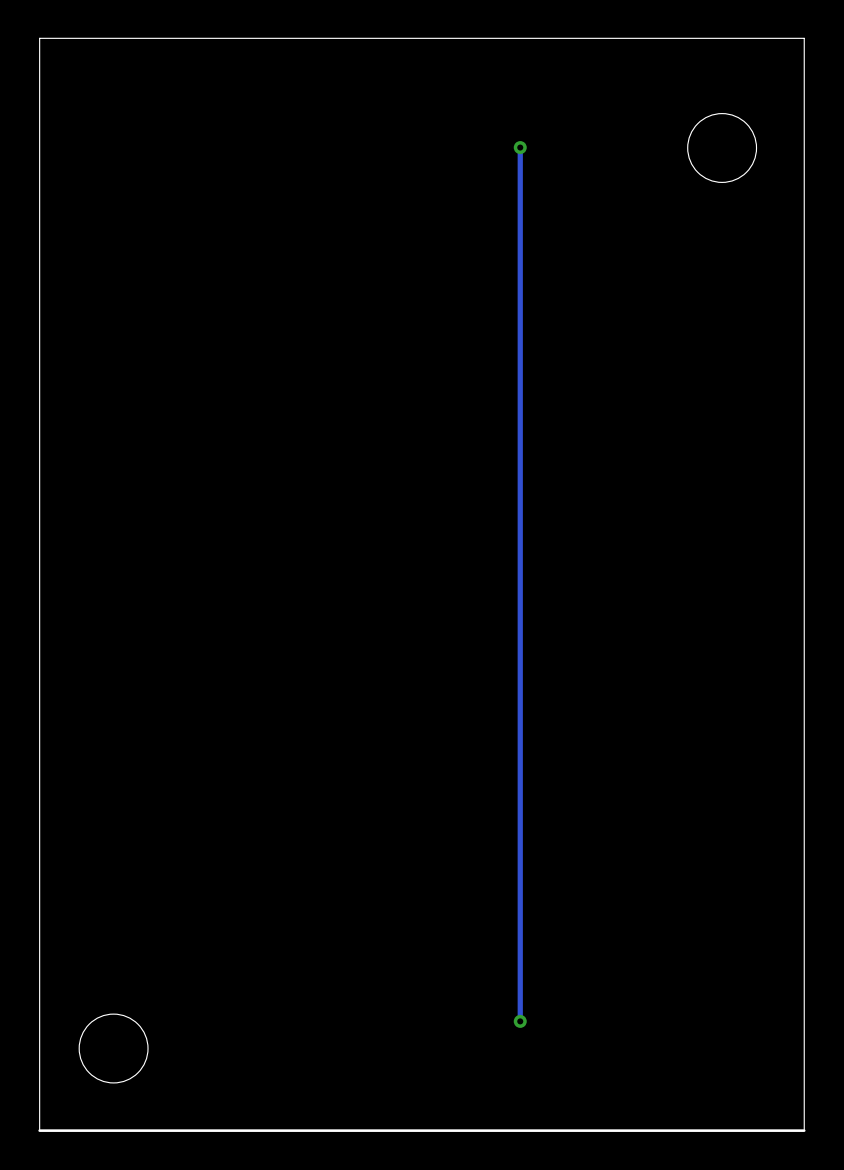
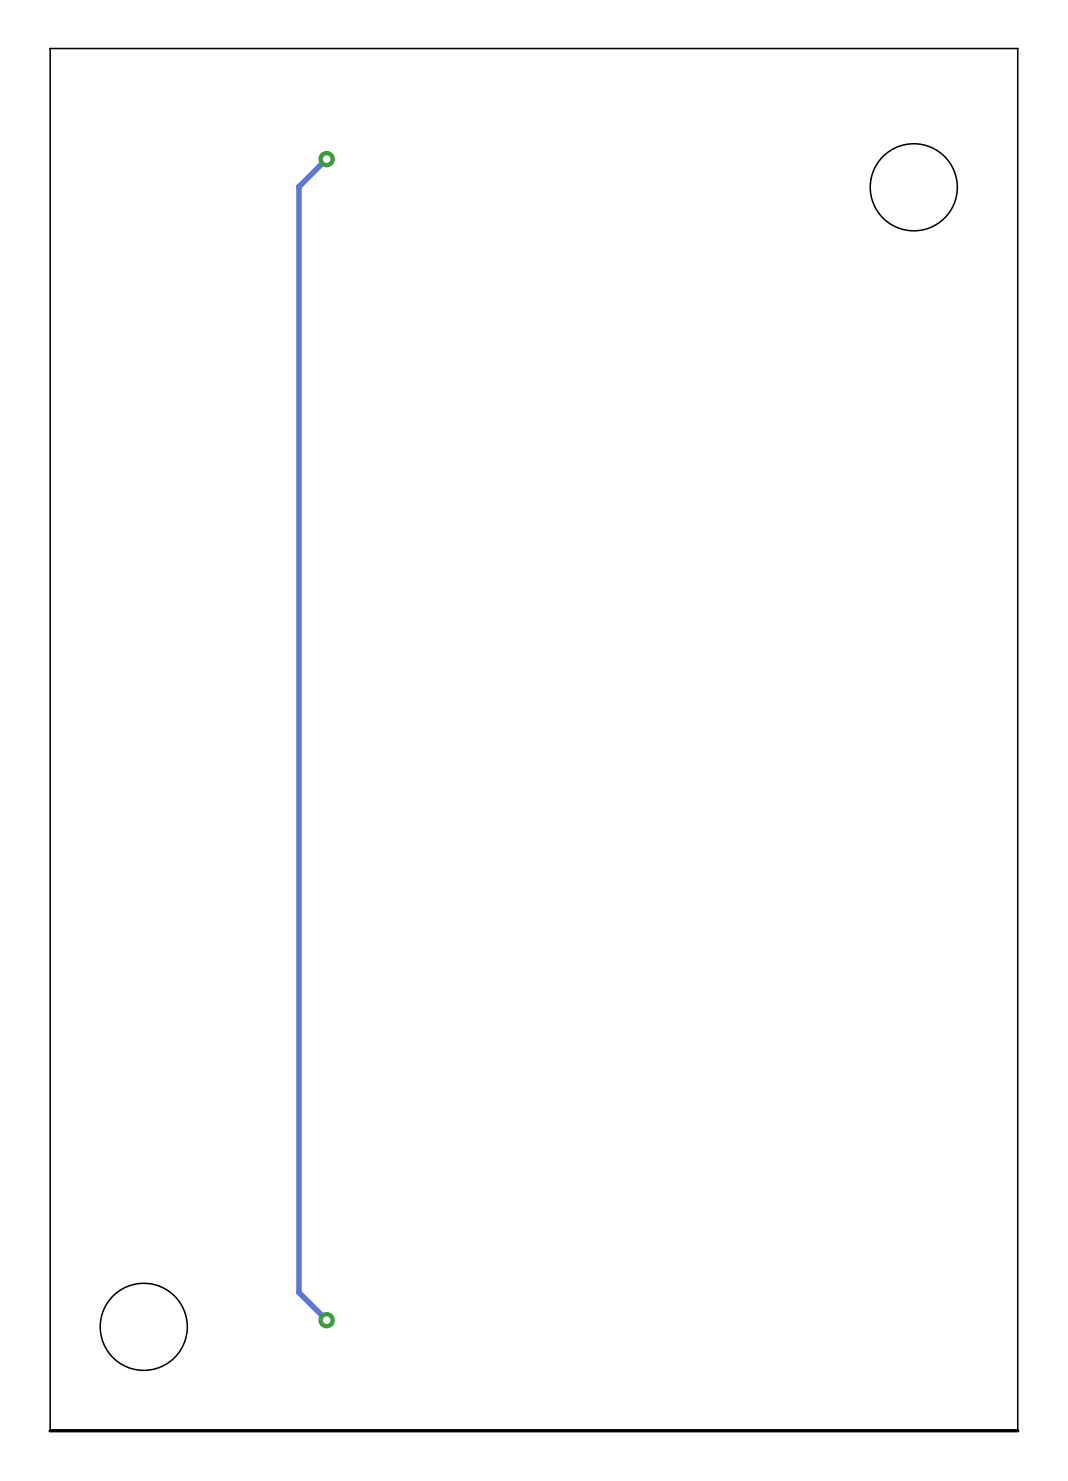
track: none -> (326, 159) (298, 186) (298, 1292) (326, 1320)
via: none -> (326, 159)
track: (520, 147) (520, 1021) -> none
via: (520, 147) -> none
via: (520, 1021) -> none
via: none -> (326, 1320)

